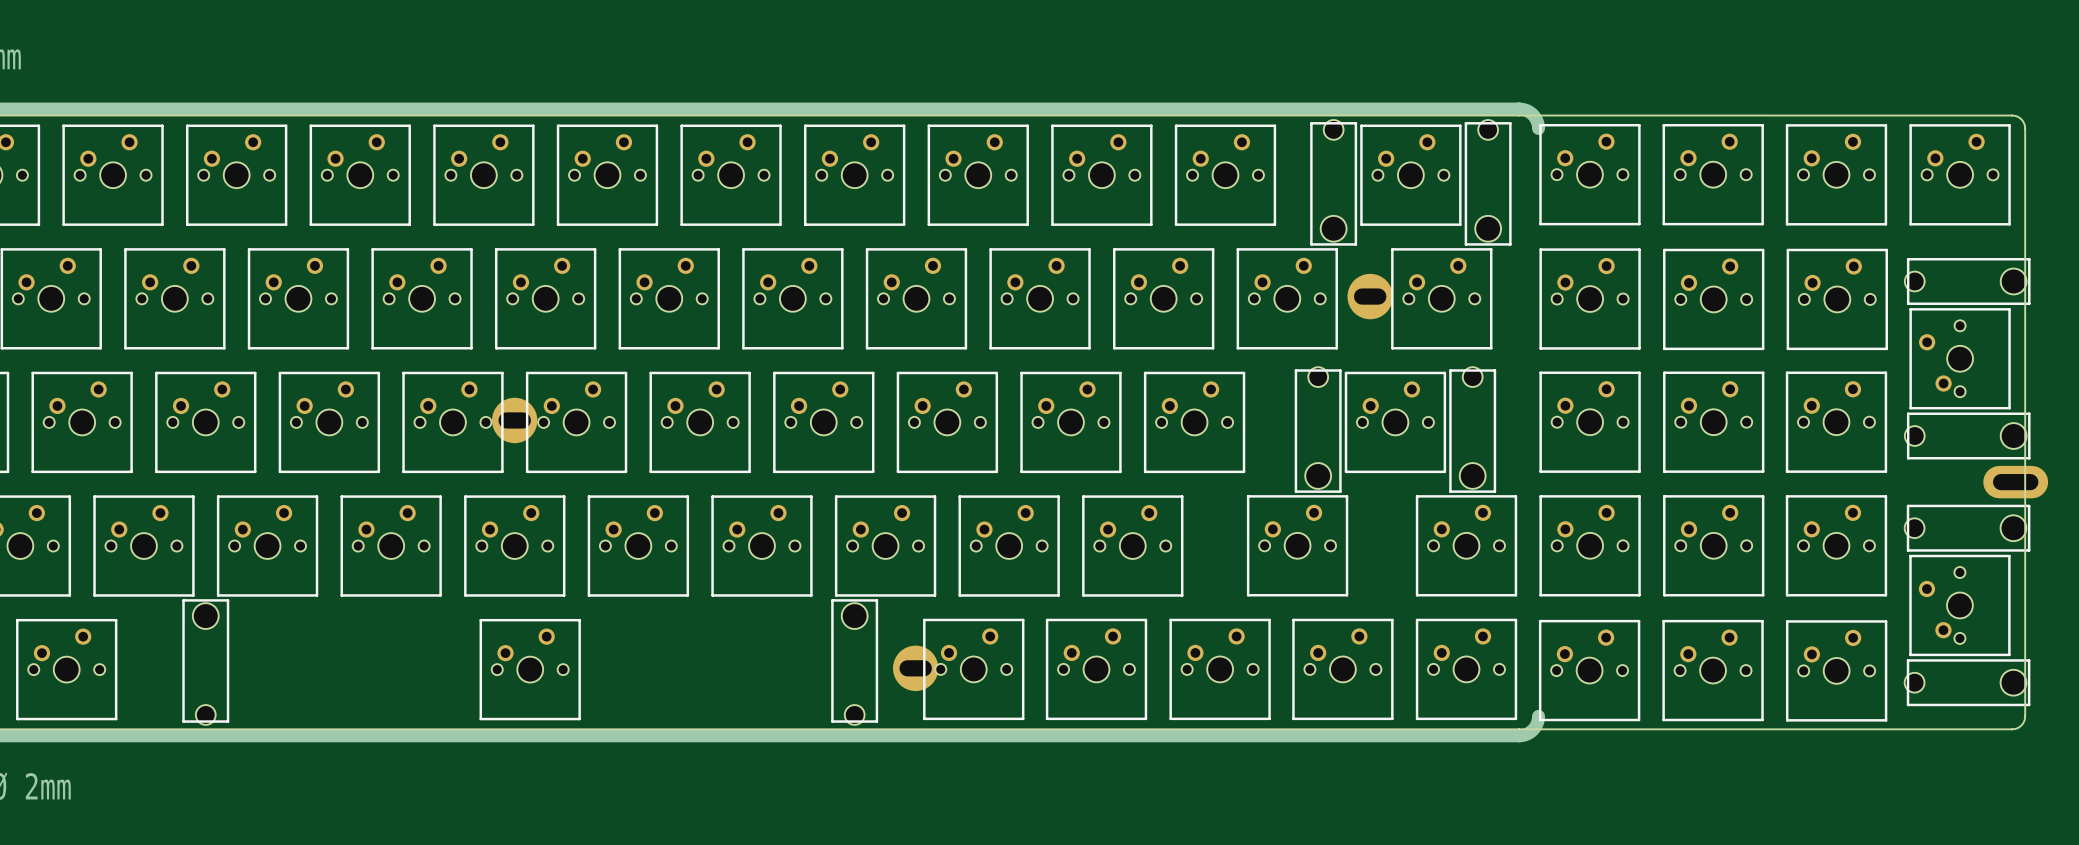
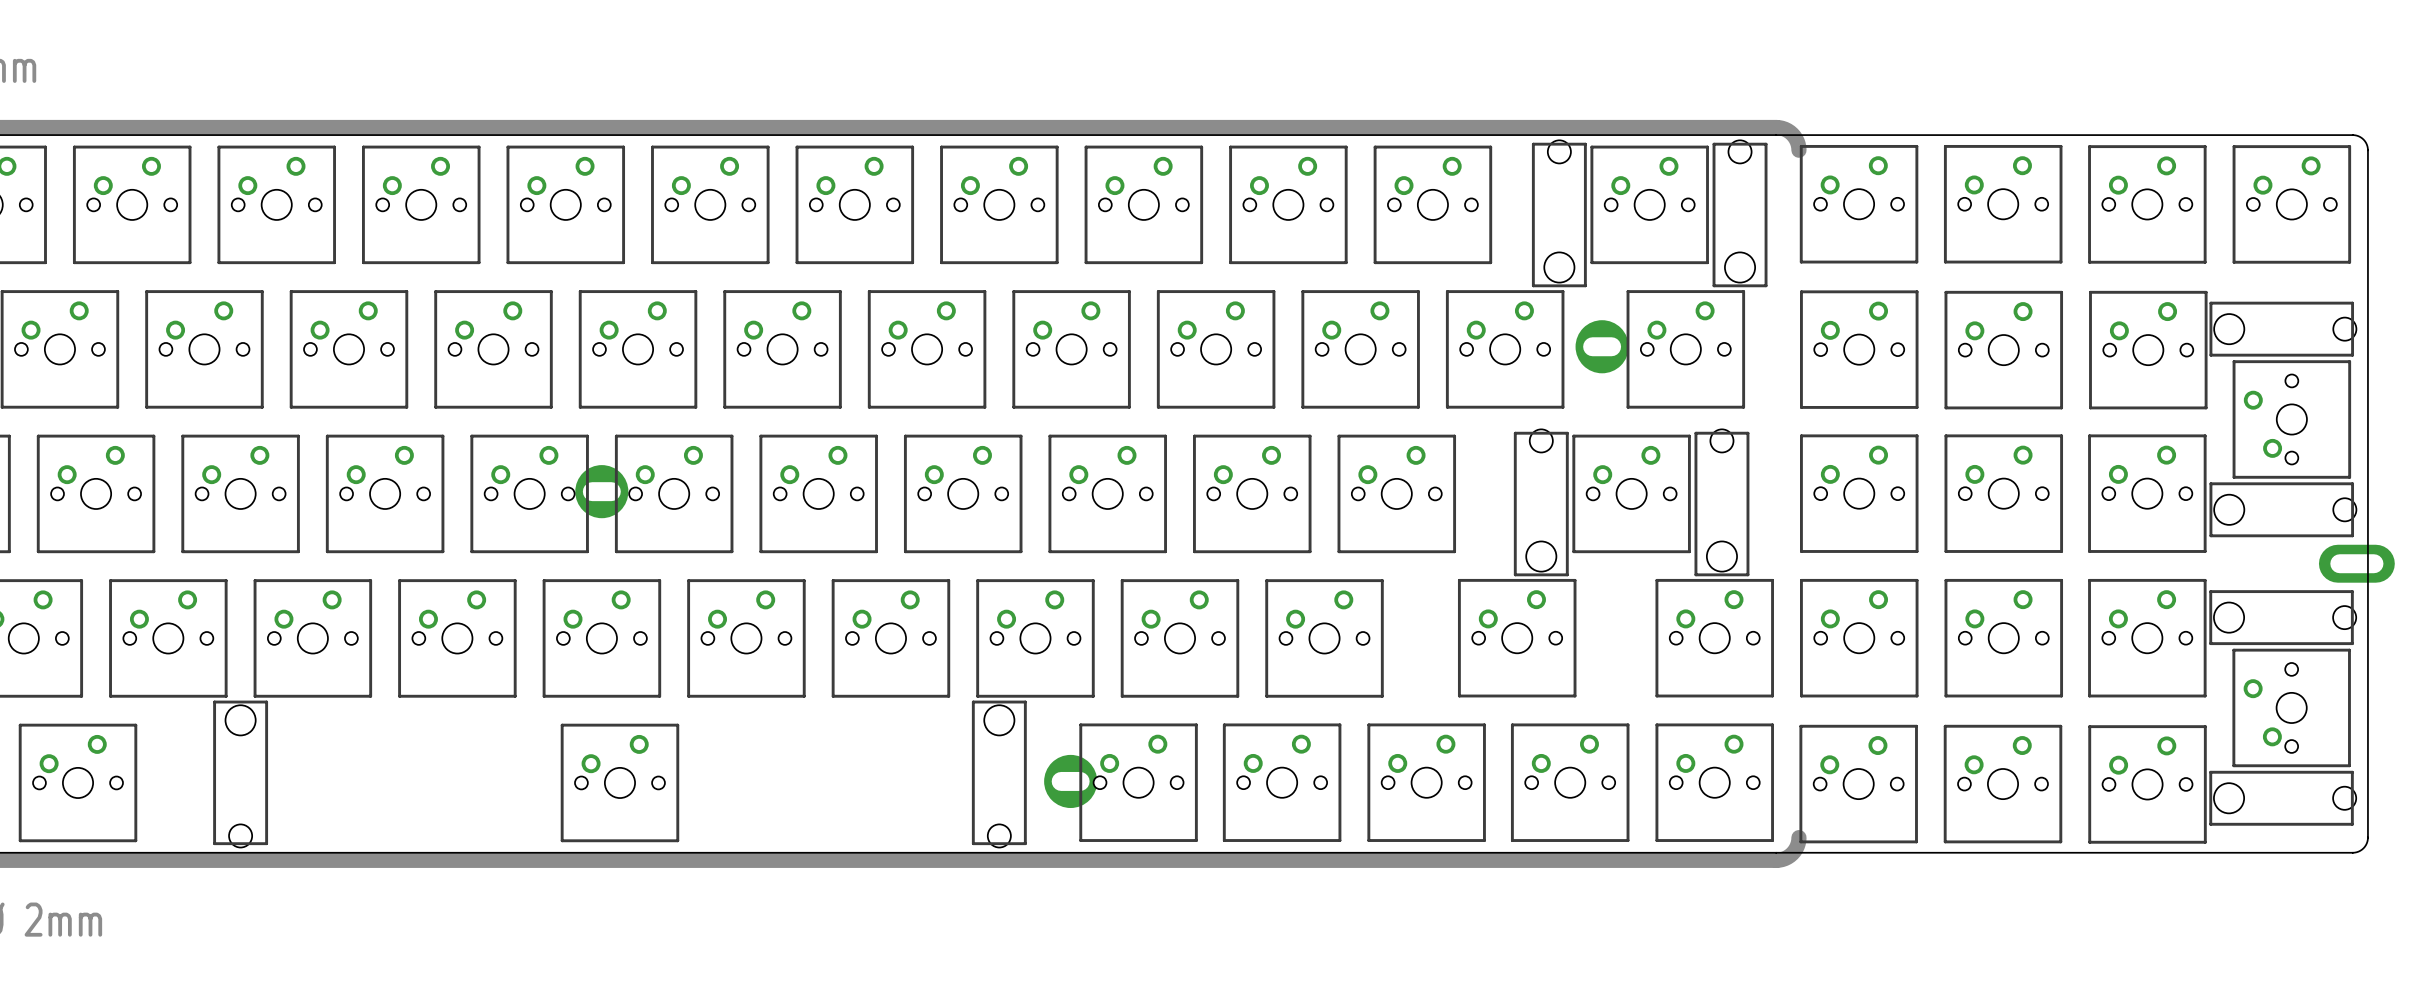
part rotation: 0° (1967, 281) -> 180° (2282, 329)
part rotation: 0° (1967, 436) -> 180° (2282, 509)
part rotation: 0° (1967, 528) -> 180° (2282, 617)
part rotation: 0° (1967, 682) -> 180° (2282, 798)

